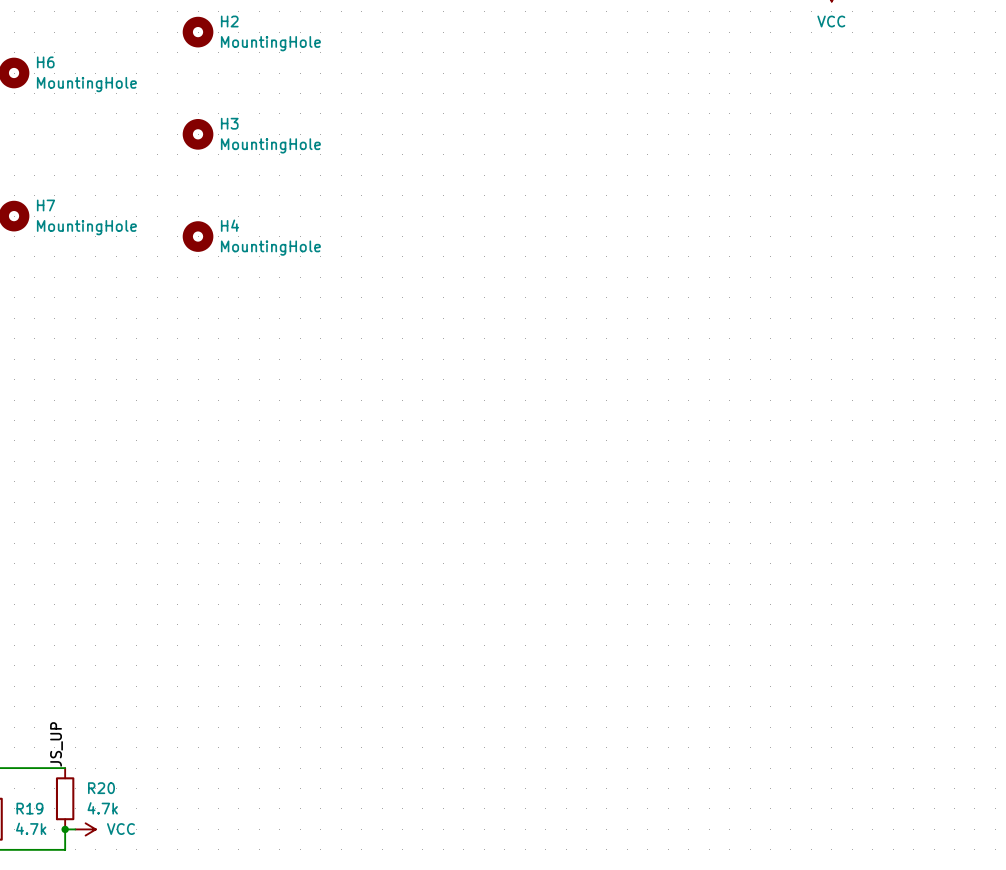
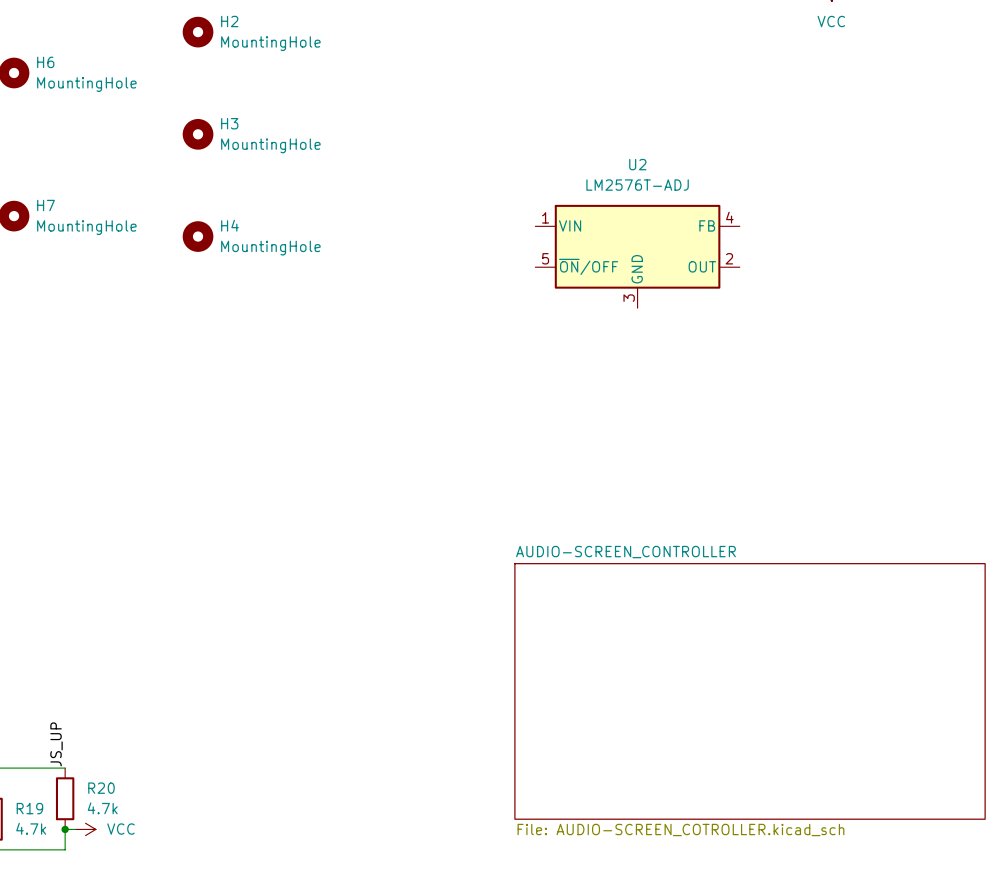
U2: none -> LM2576T-ADJ (637, 256)
sheet AUDIO-SCREEN_CONTROLLER: none -> File: AUDIO-SCREEN_COTROLLER.kicad_sch (750, 691)

